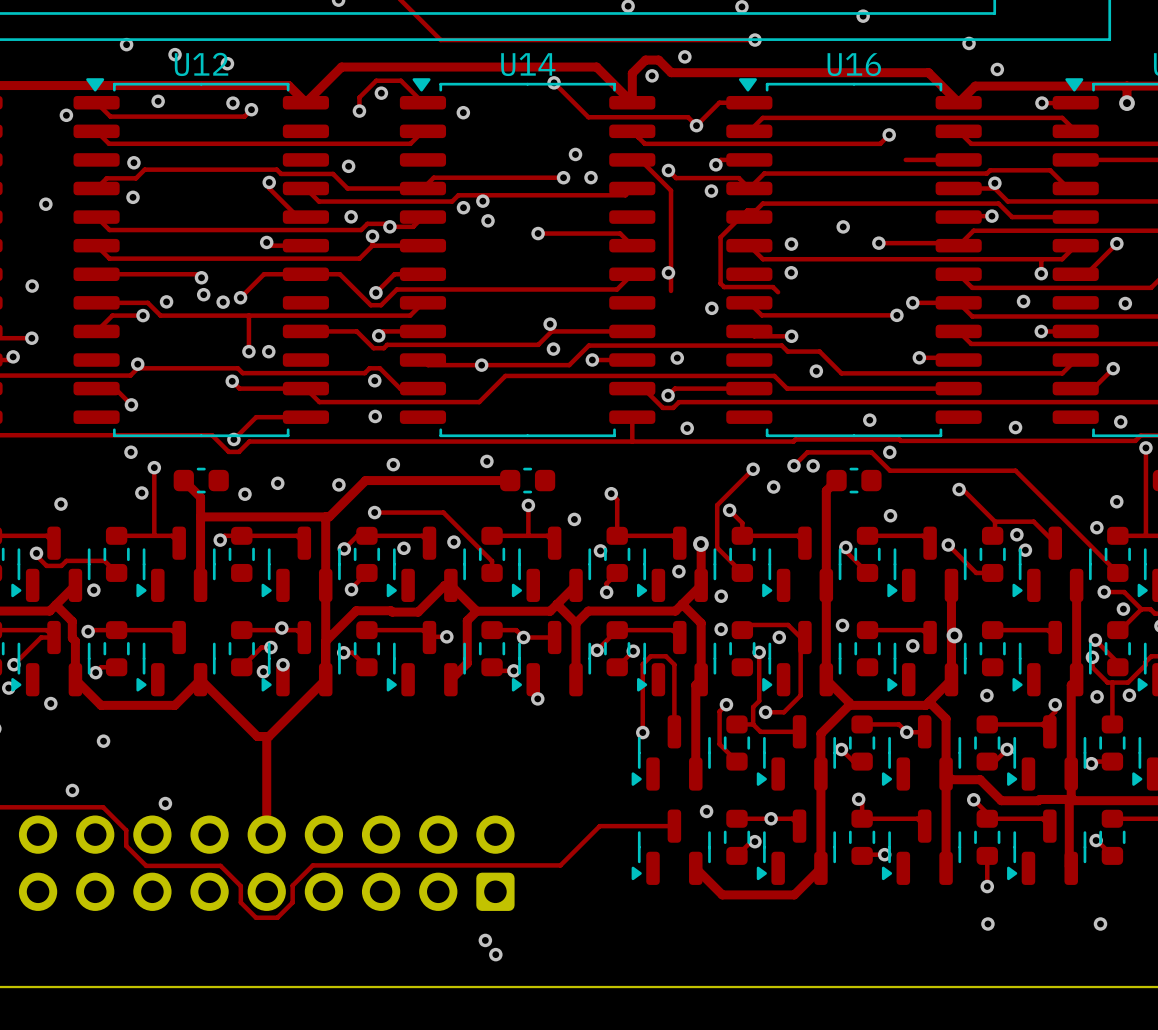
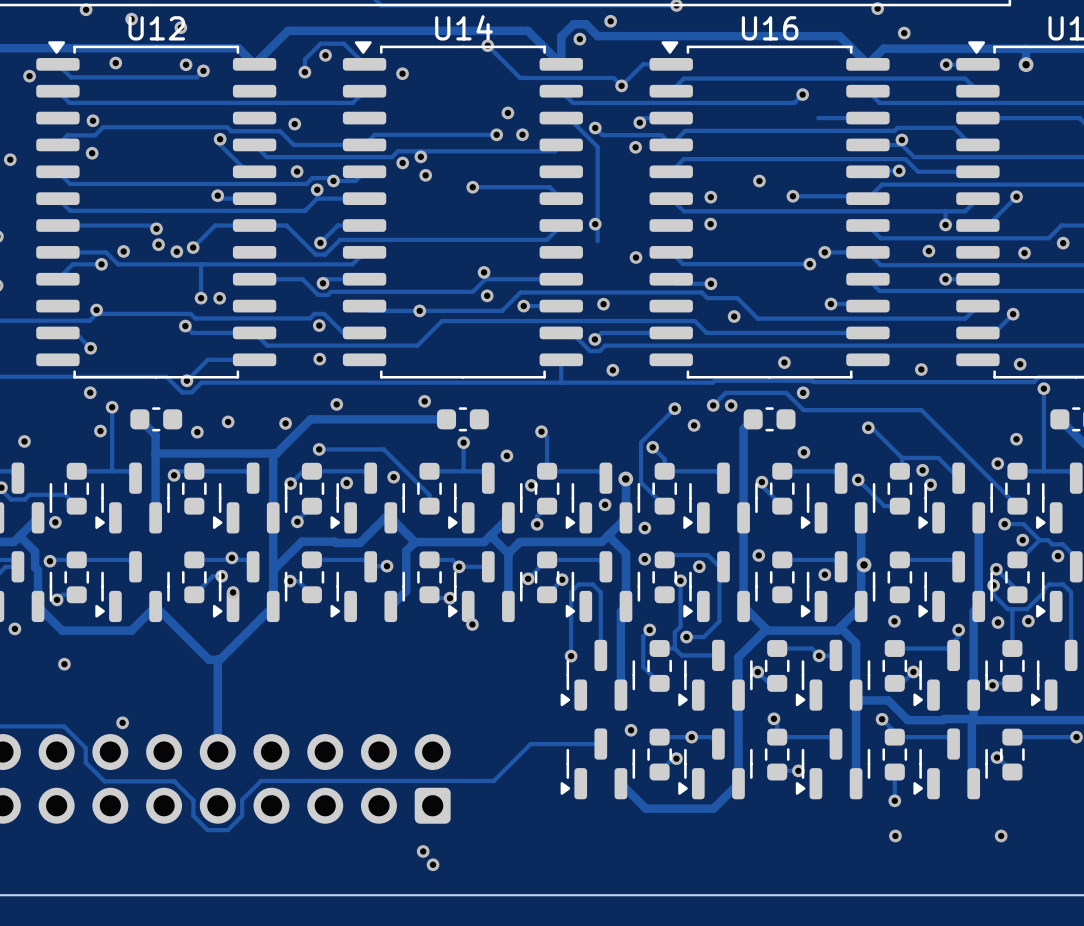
track: (756, 210) (747, 210) (720, 237) (720, 283) (724, 287) (772, 287) (778, 292) -> none
via: (263, 671) -> none
via: (72, 790) -> none

